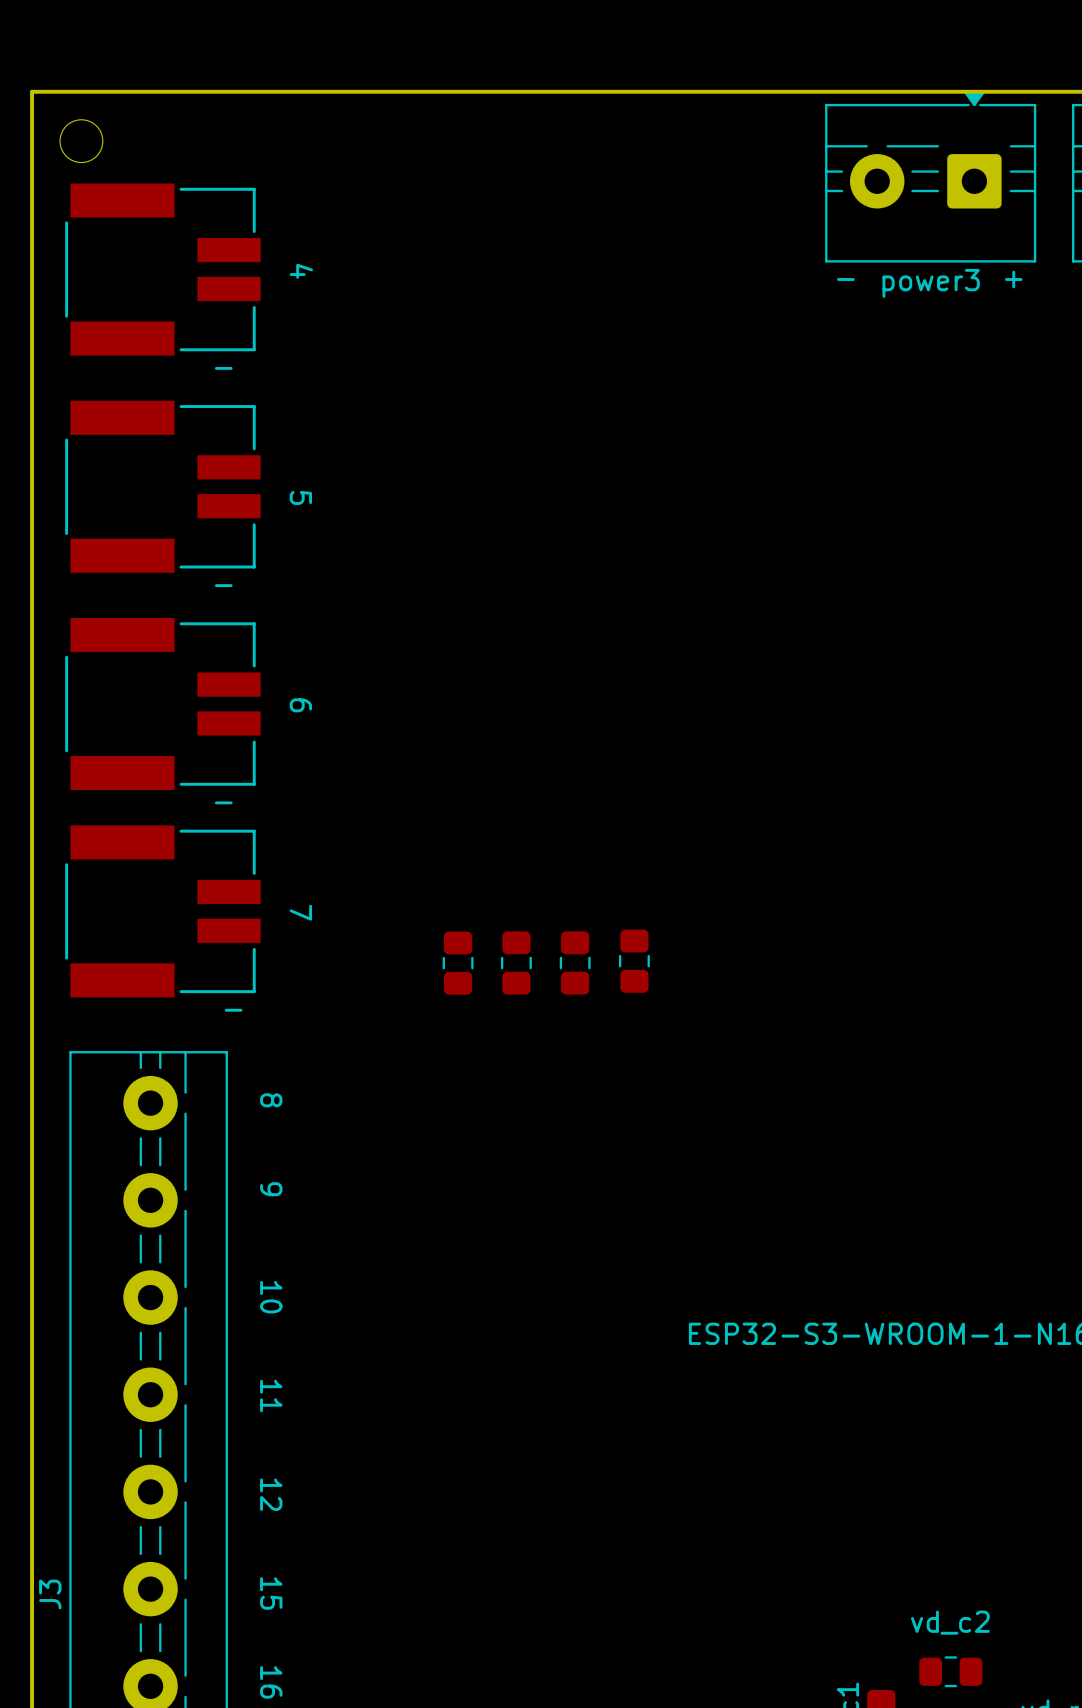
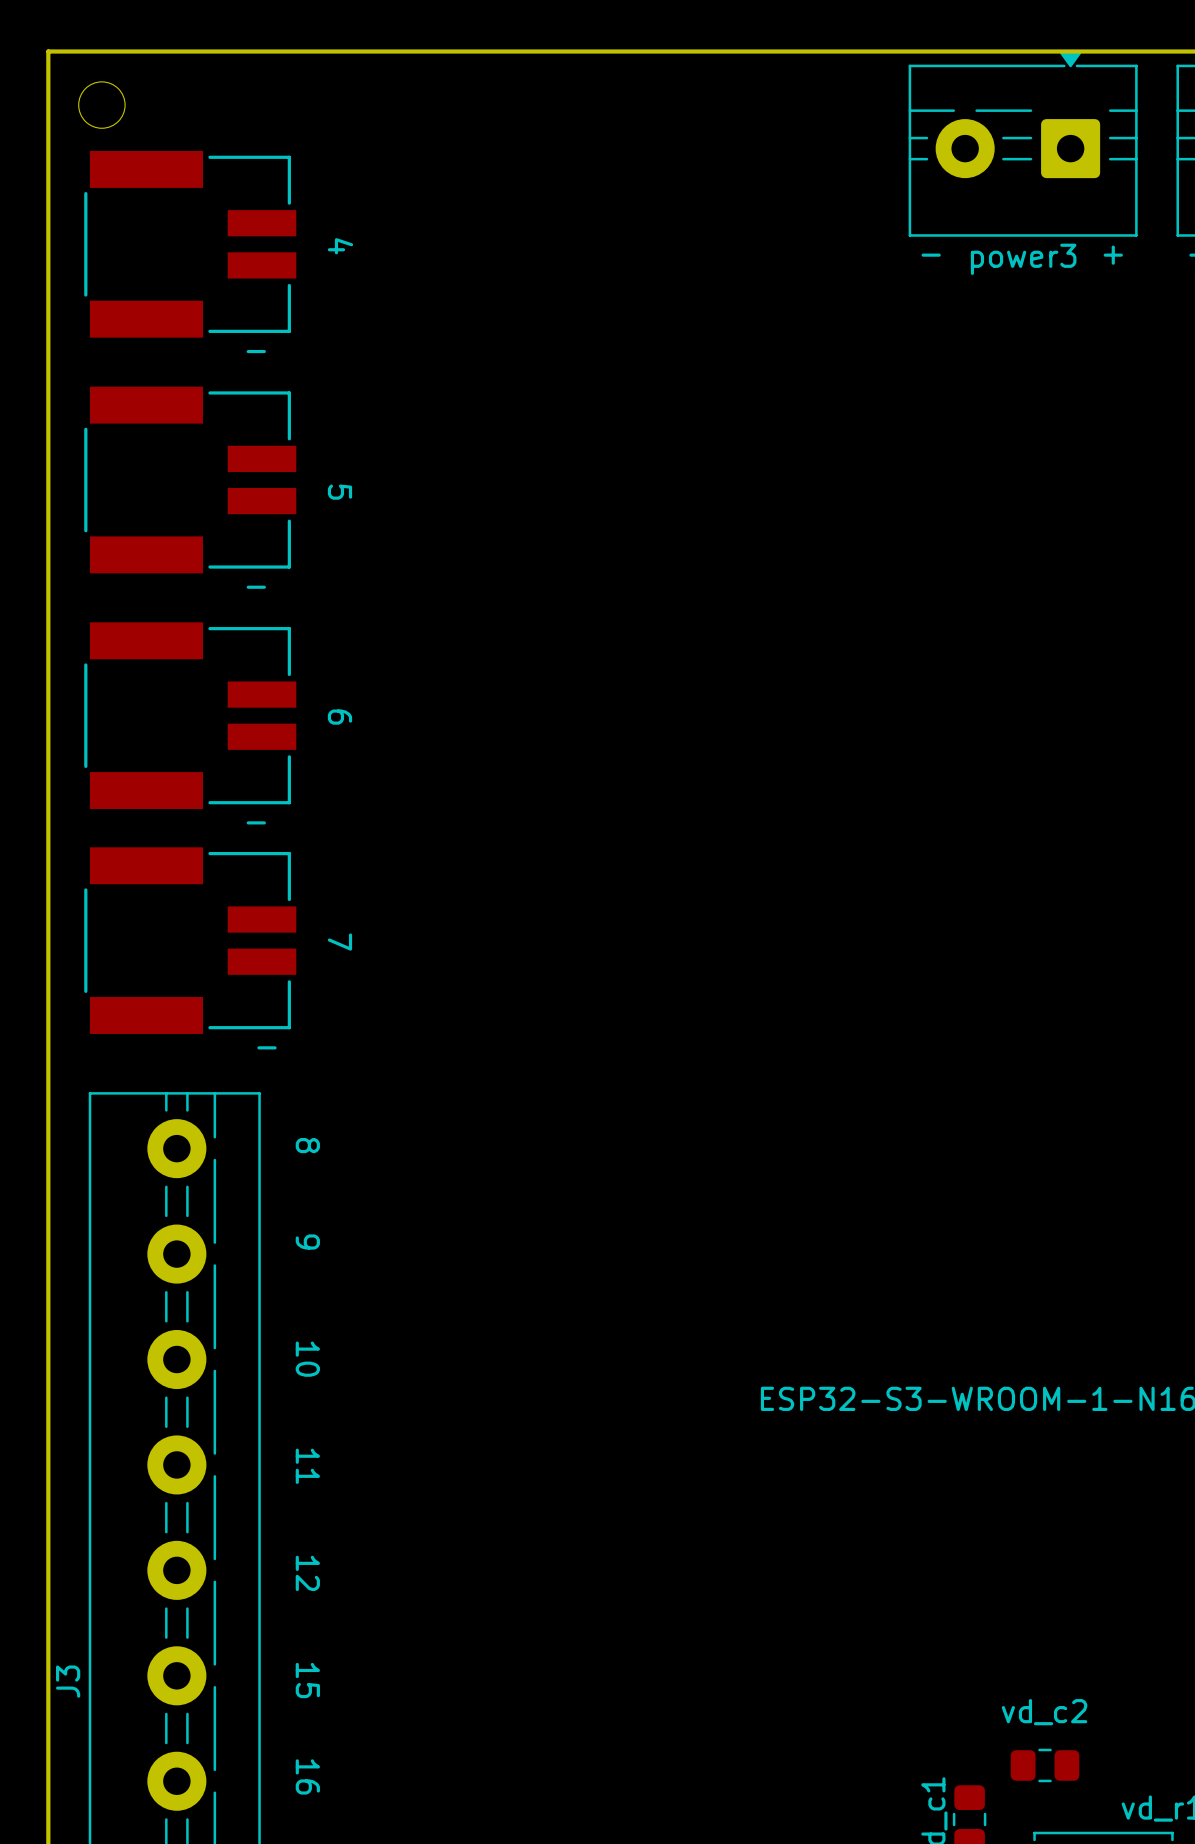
part: (634, 961) -> none
part: (516, 962) -> none
part: (575, 962) -> none
part: (458, 963) -> none

